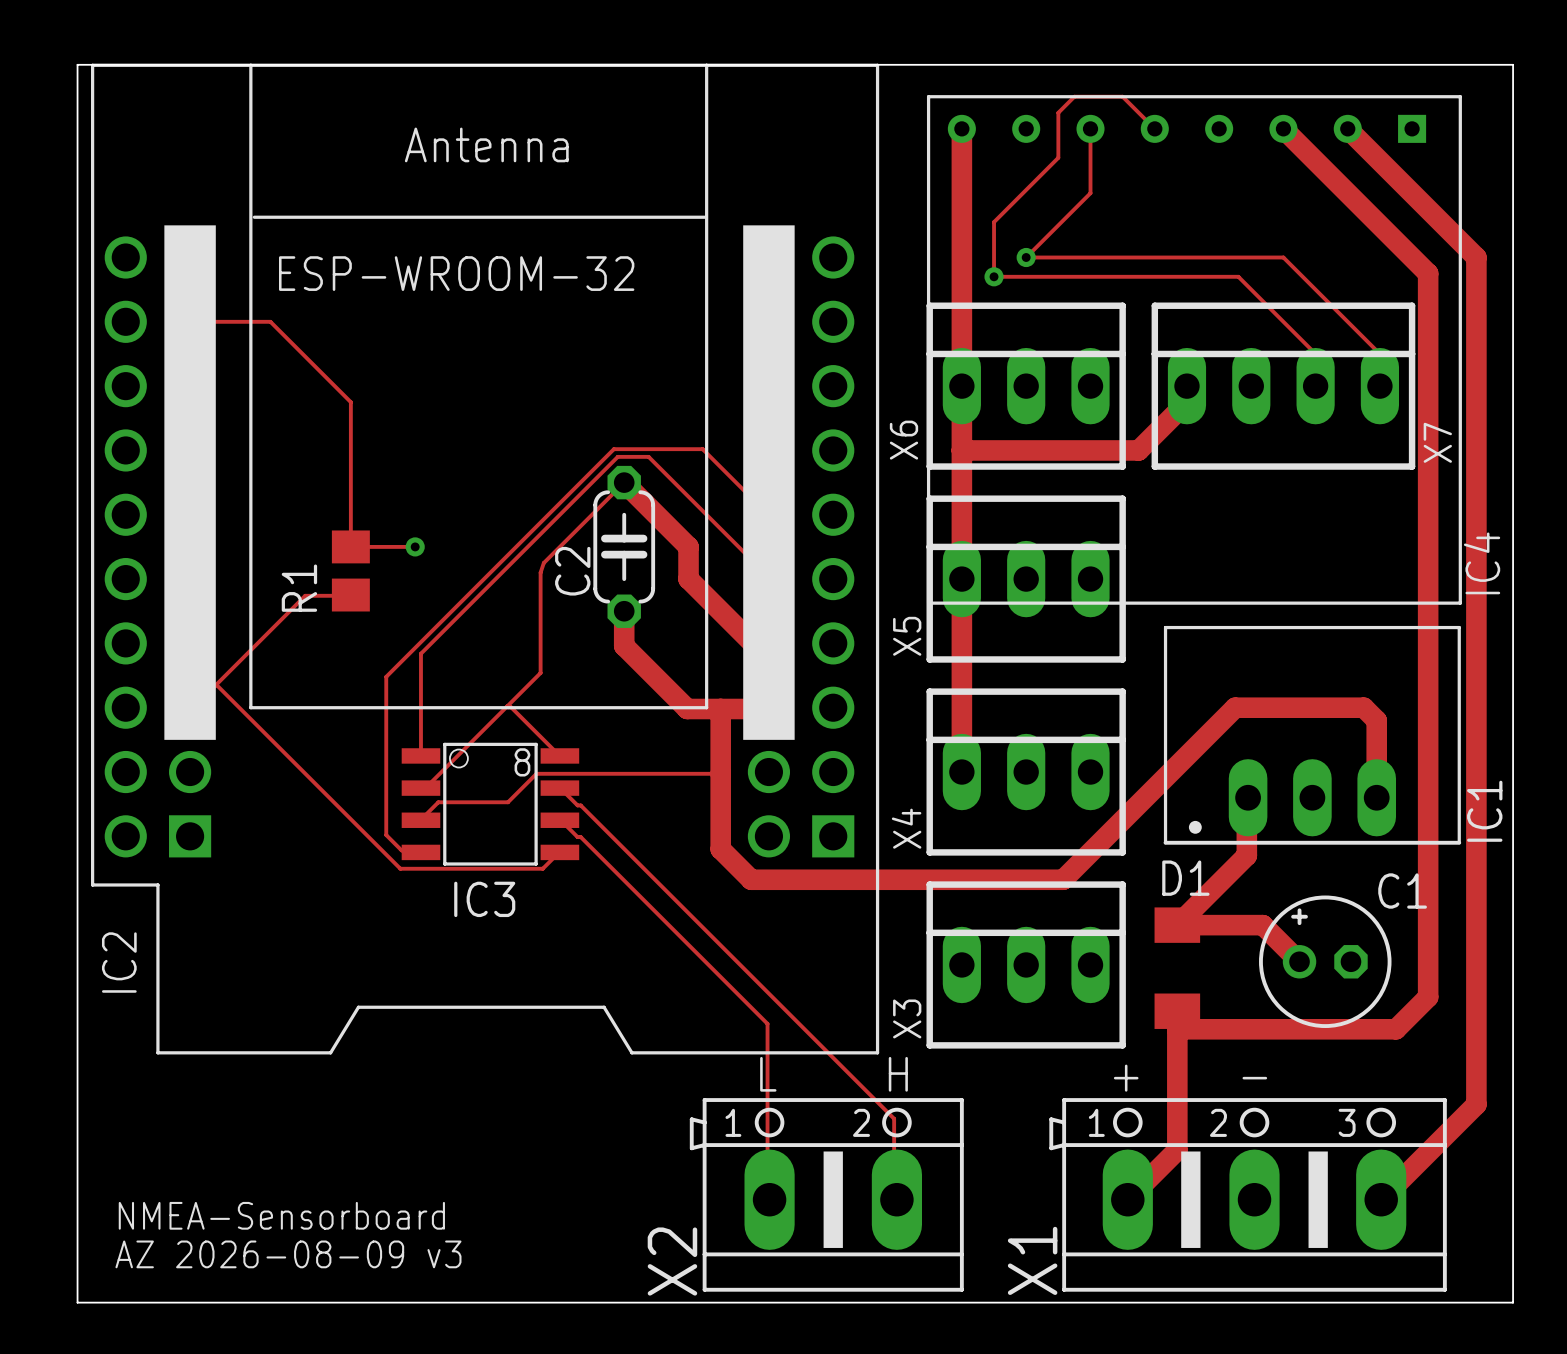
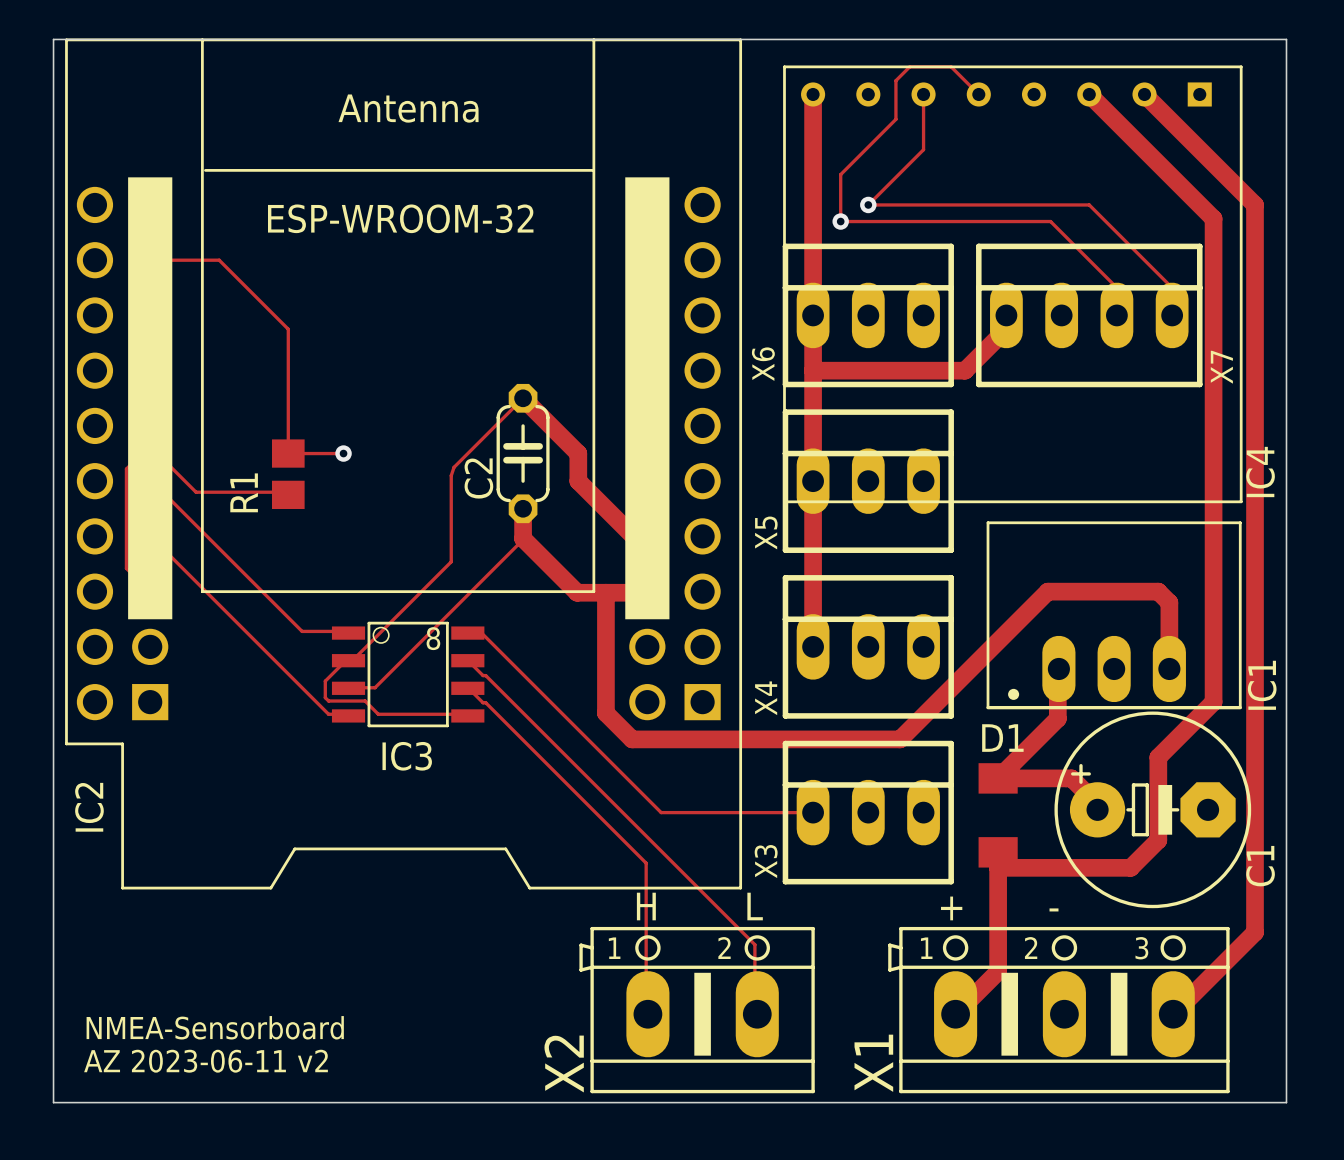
track: (768, 514) (702, 449) (613, 449) (386, 676) (386, 835) (401, 850) -> (150, 536) (328, 714) (331, 714)
track: (768, 579) (648, 456) (617, 456) (420, 653) (420, 754) -> (150, 481) (302, 631) (348, 631)
track: (350, 595) (305, 595) (193, 707) (190, 707) -> (285, 492) (196, 492) (159, 455) (139, 455) (126, 469) (126, 568) (150, 591)
track: (216, 684) (400, 868) (542, 868) (559, 852) -> (348, 657) (325, 681) (325, 697) (328, 701) (365, 701) (378, 714) (467, 714) (467, 715)
track: (507, 706) (511, 707) (559, 755) -> (813, 812) (661, 812) (481, 633) (467, 633)
track: (720, 773) (536, 773) (507, 802) (438, 802) (420, 820) -> (523, 539) (375, 687) (348, 687)
track: (1428, 836) (1428, 997) (1396, 1029) (1331, 1029) -> (1213, 702) (1158, 757) (1158, 840) (1130, 867)
C1 name position: C1 (1402, 891) -> C1 (1260, 866)
C1 footprint: [1259, 895, 1392, 1029] -> [1054, 711, 1252, 909]
text: L (768, 1074) -> H (646, 906)
text: H (898, 1074) -> L (755, 906)
text: AZ 2026-08-09 v3 (288, 1254) -> AZ 2023-06-11 v2 (206, 1061)

